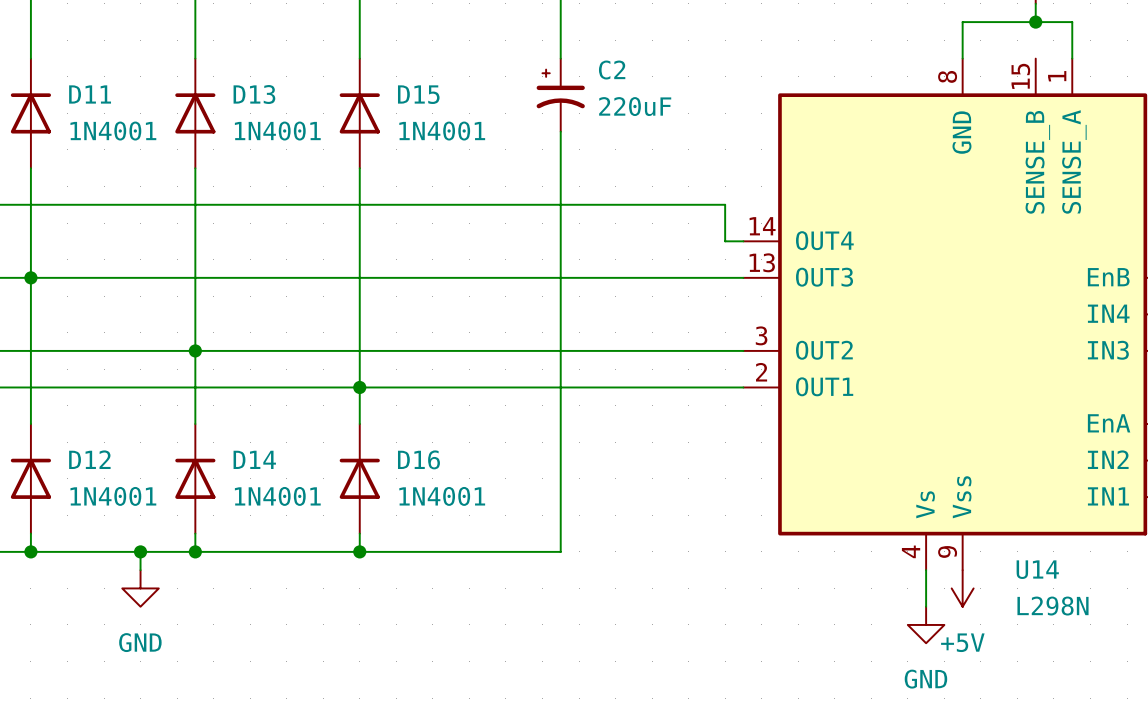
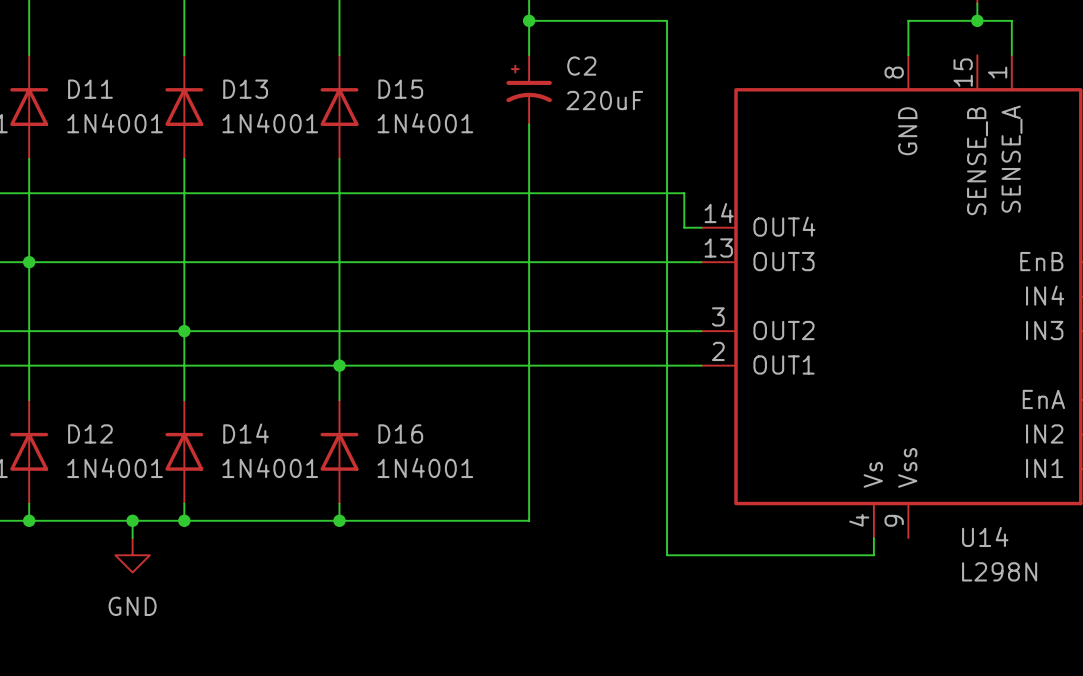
junction: none -> (529, 20)
wire: (926, 588) (926, 606) -> (873, 555) (667, 555) (667, 20) (529, 20)
power symbol: +5V (962, 588) -> none
power symbol: GND (926, 624) -> none

